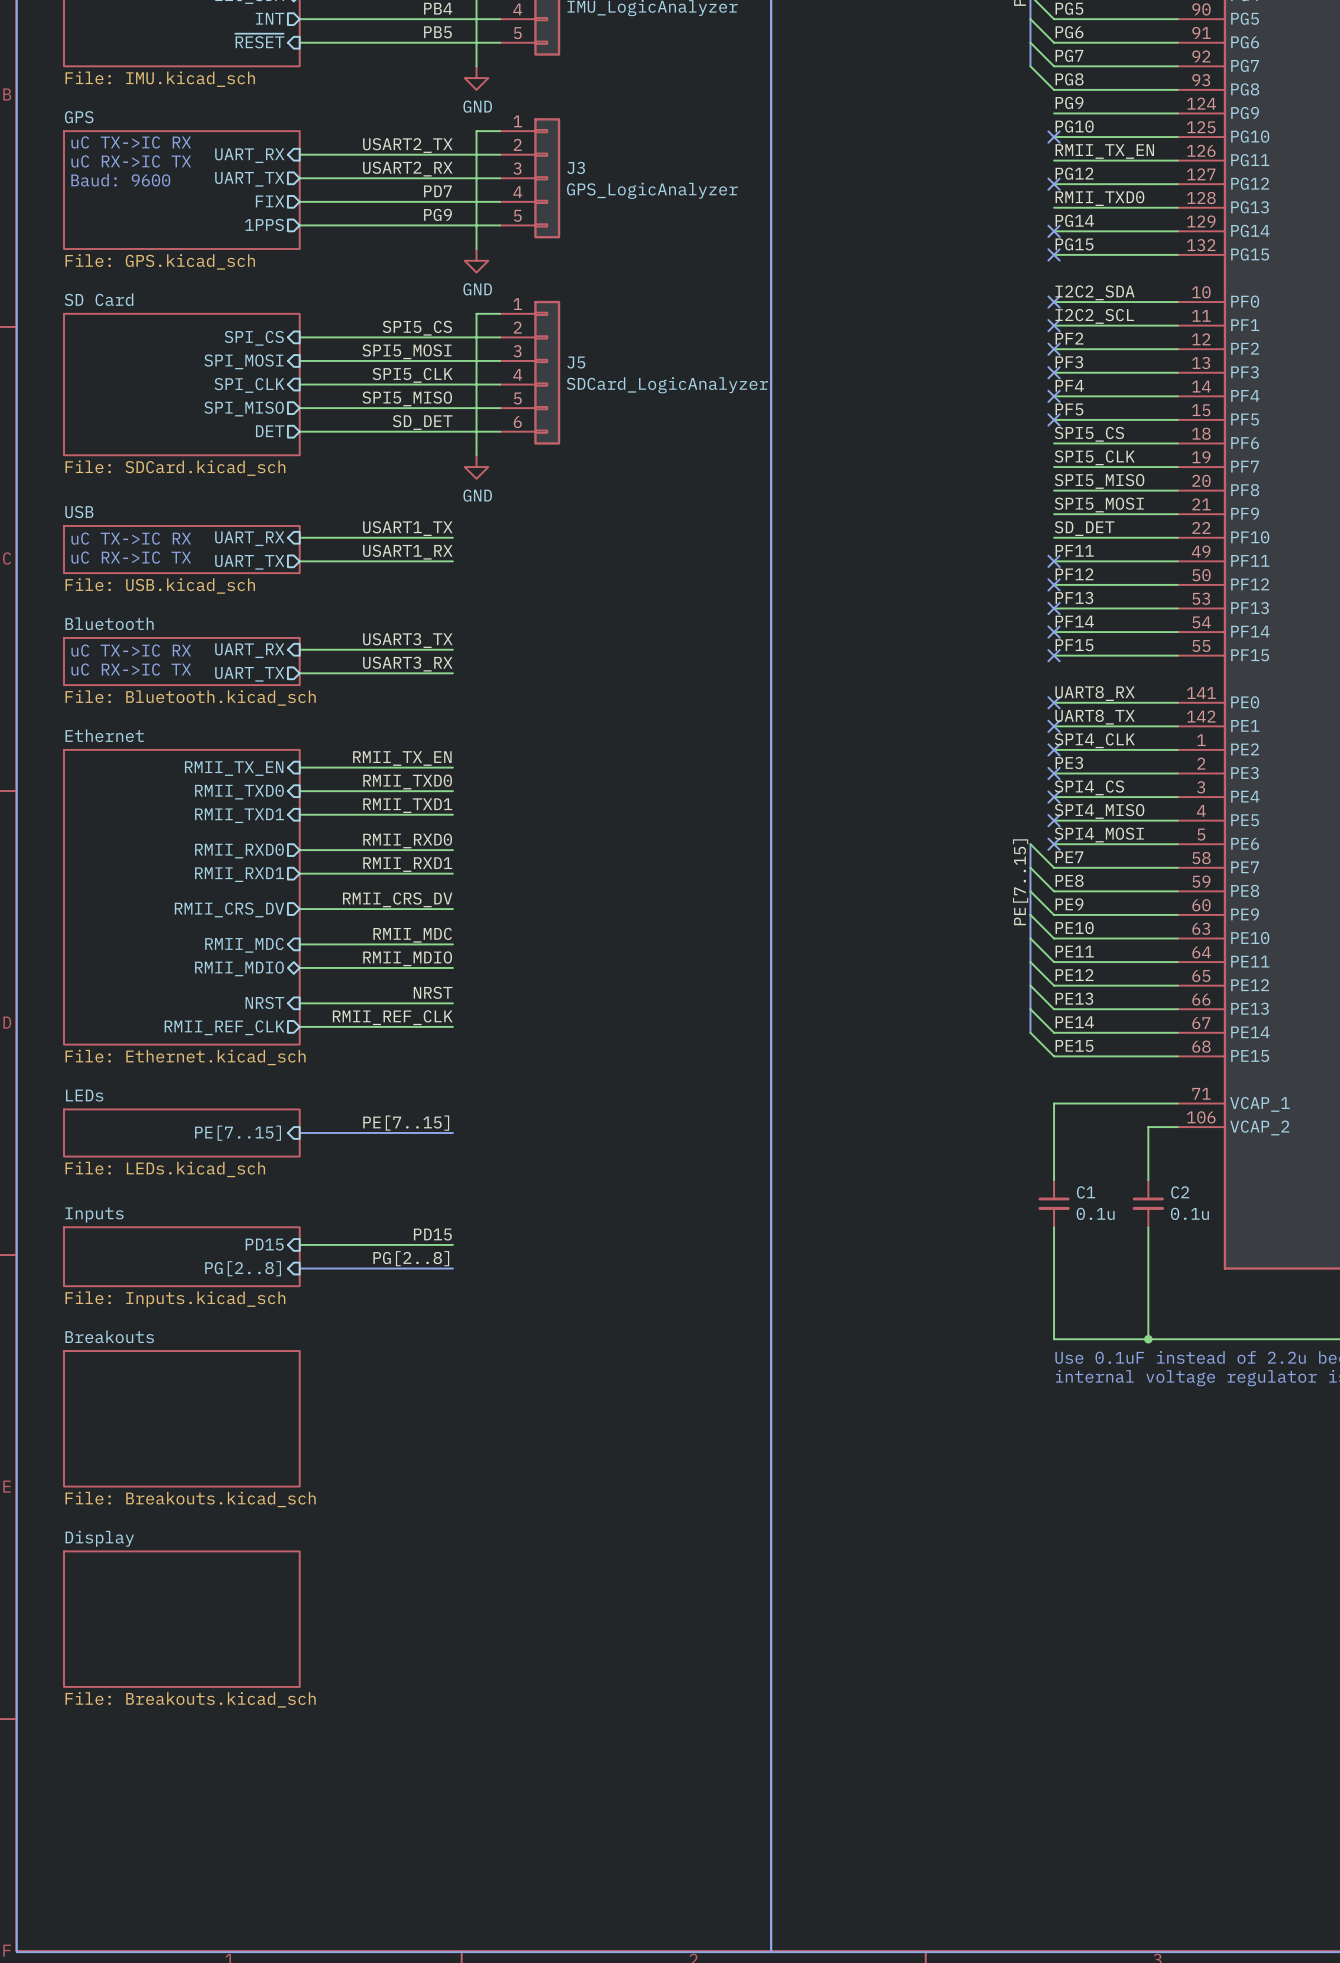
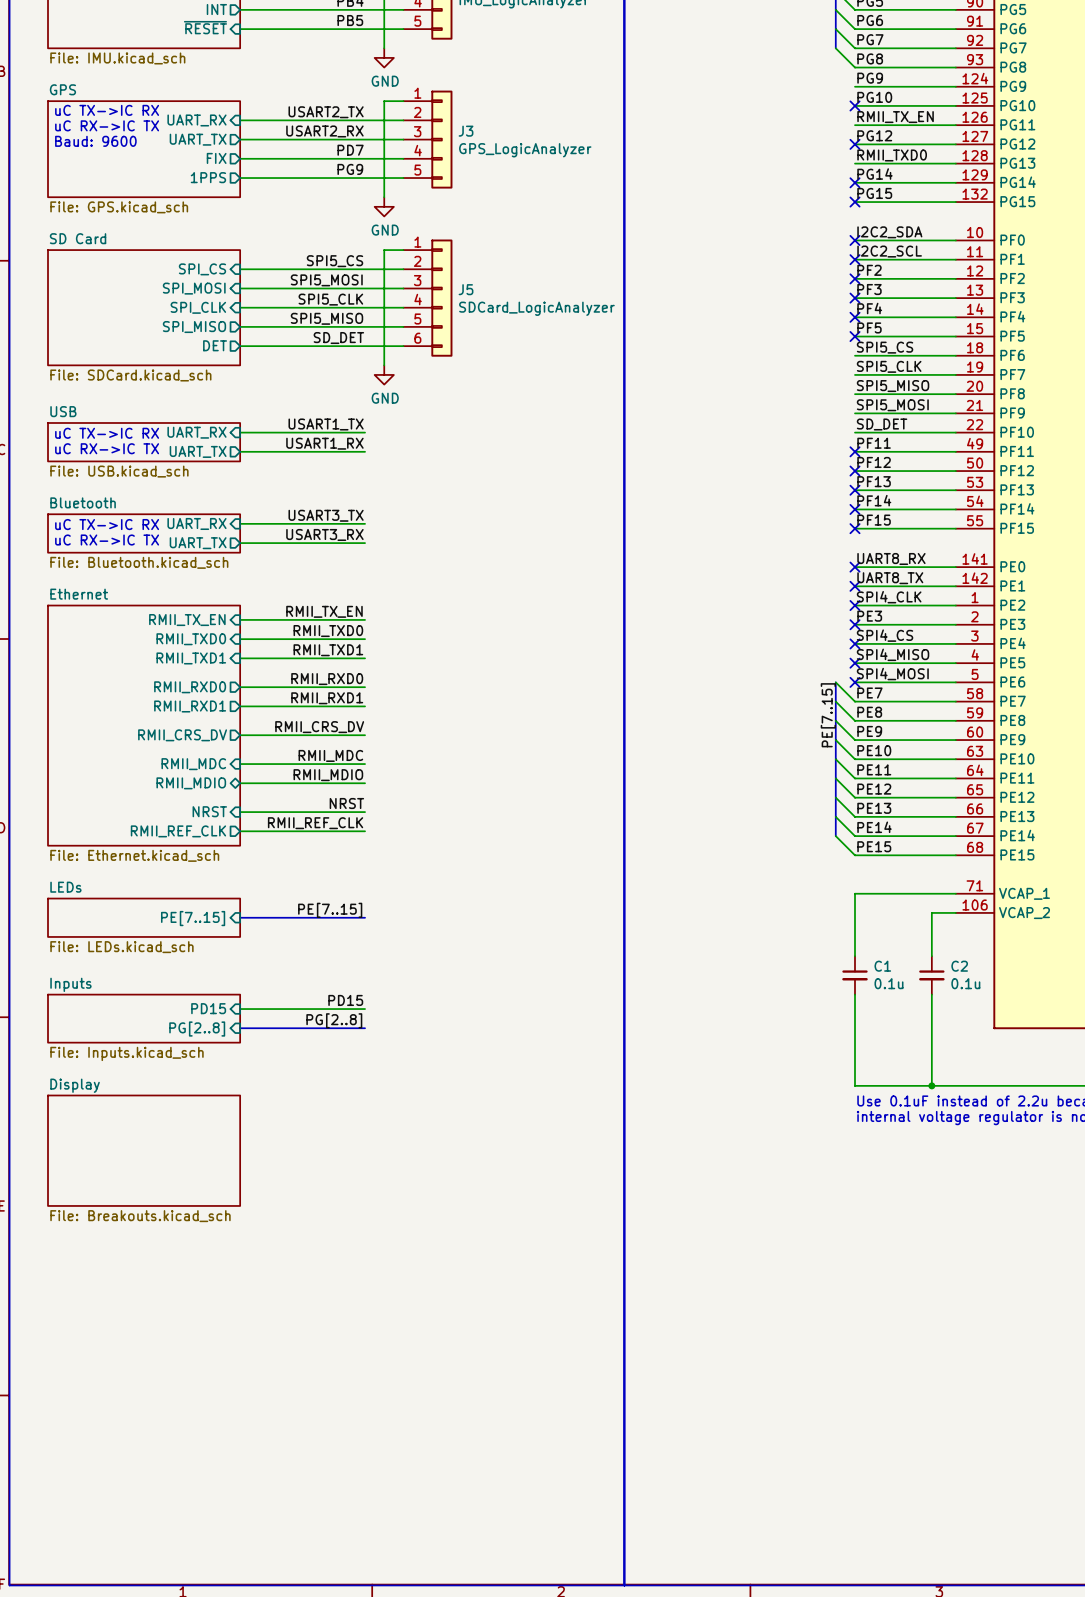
sheet Breakouts name: Breakouts (109, 1336) -> Display (75, 1085)
sheet Display: File: Breakouts.kicad_sch (181, 1619) -> none

